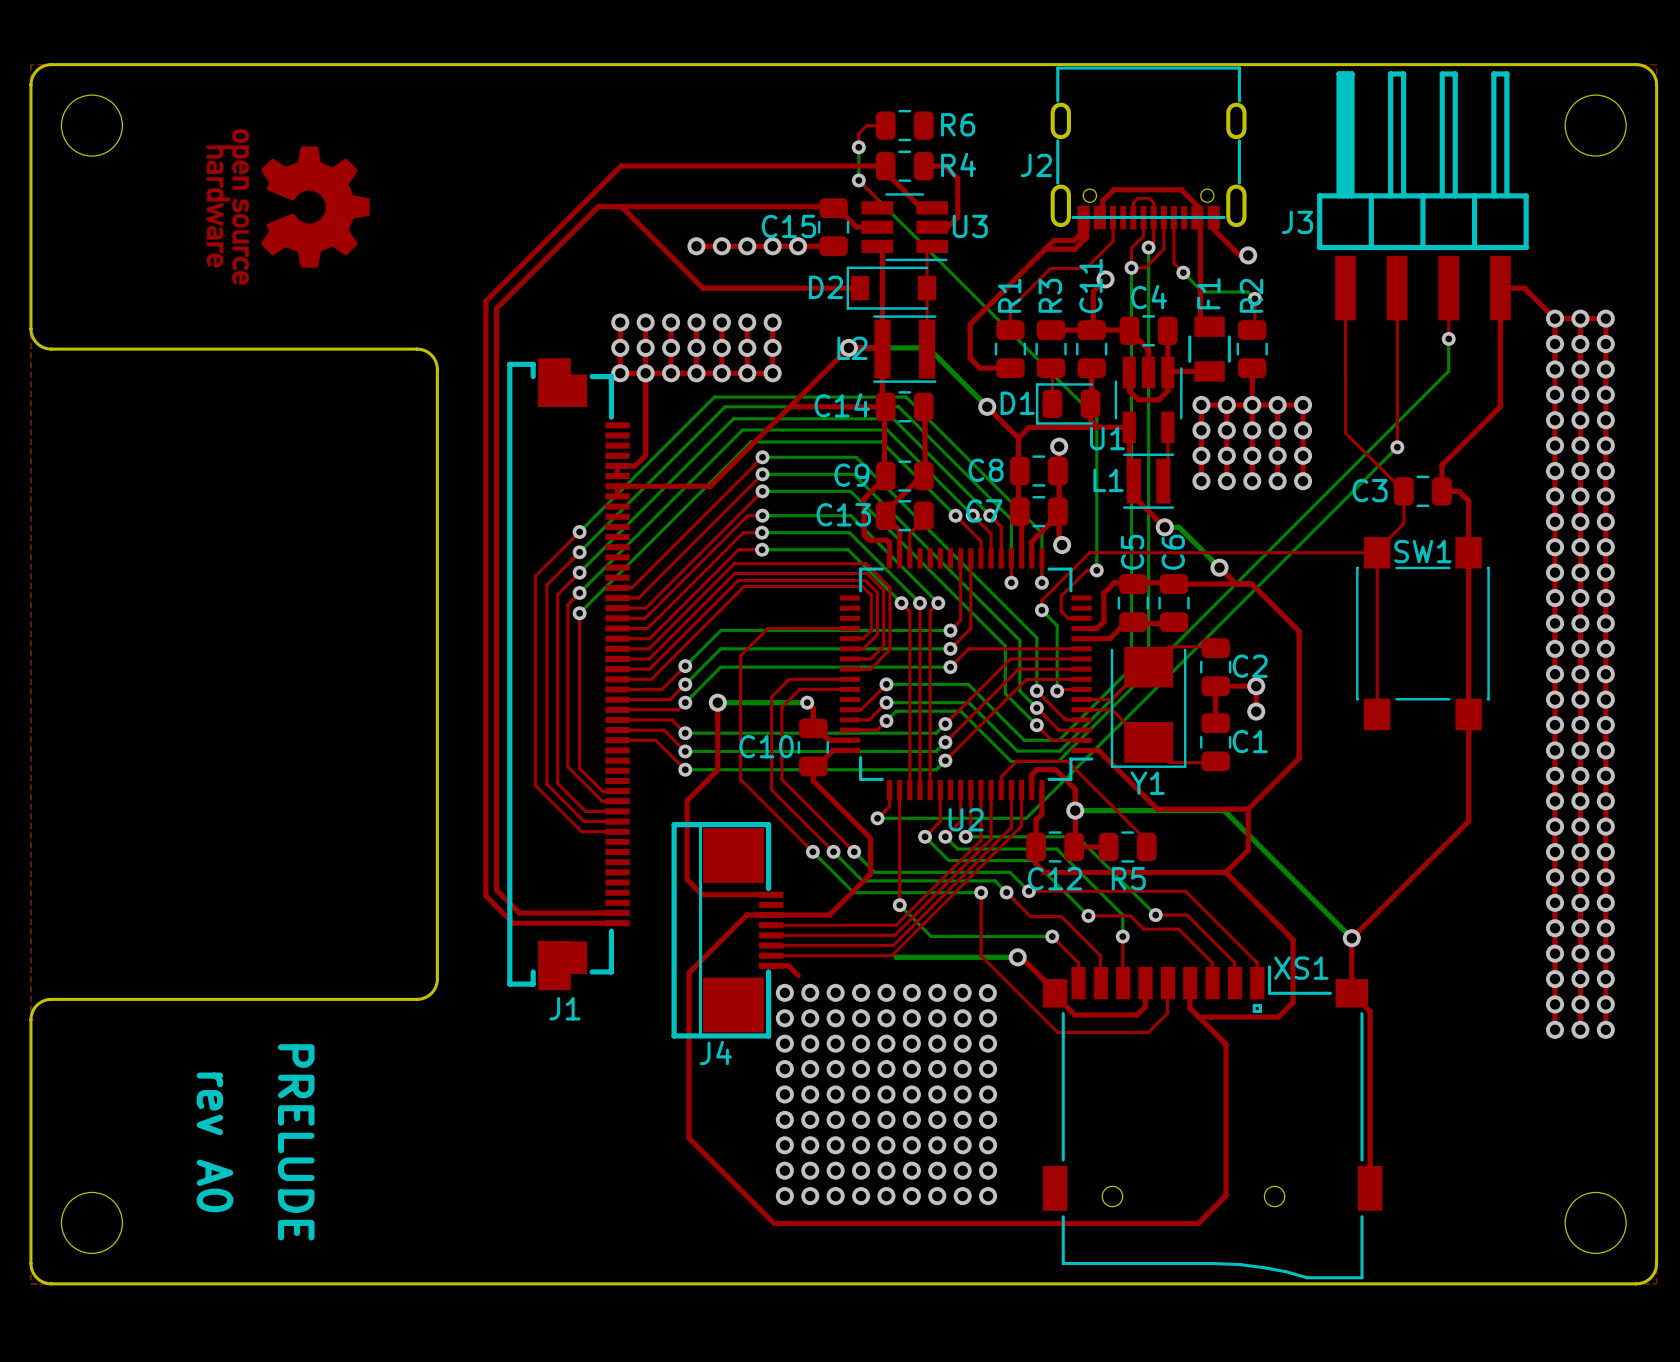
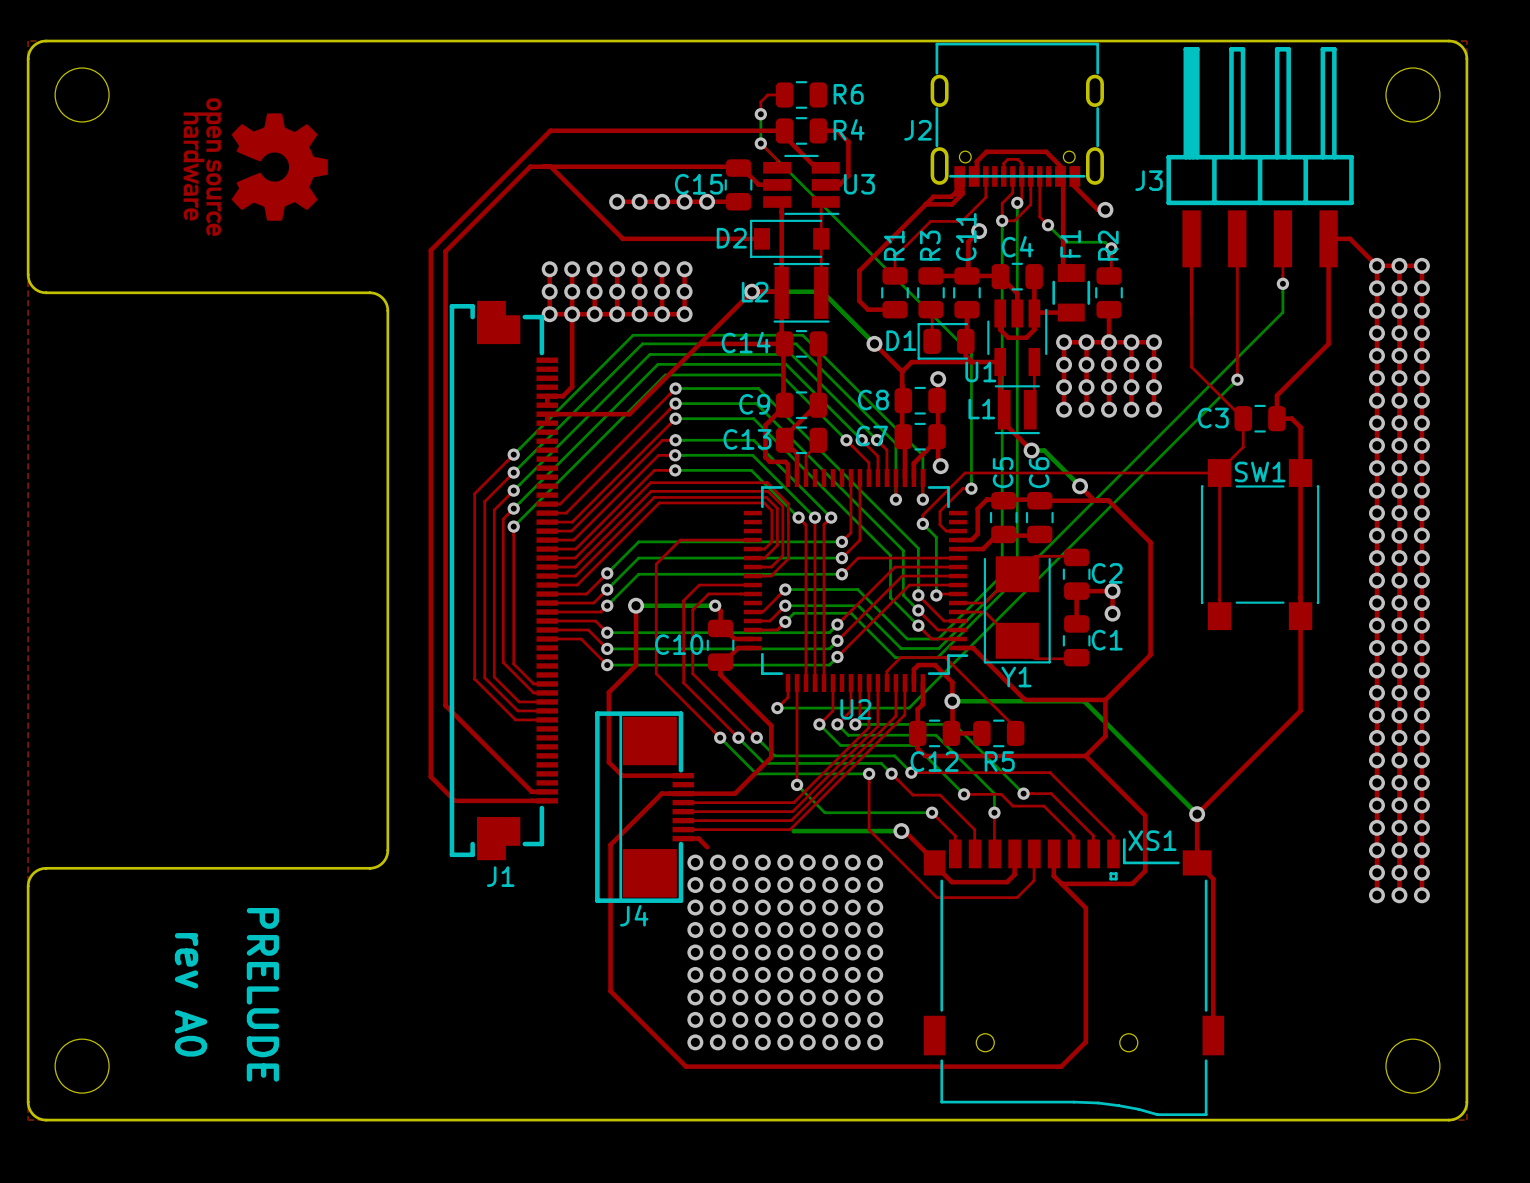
top track: (502, 302) (496, 308) (496, 890) (519, 913) (600, 913) -> (445, 251) (445, 705) (531, 791)

